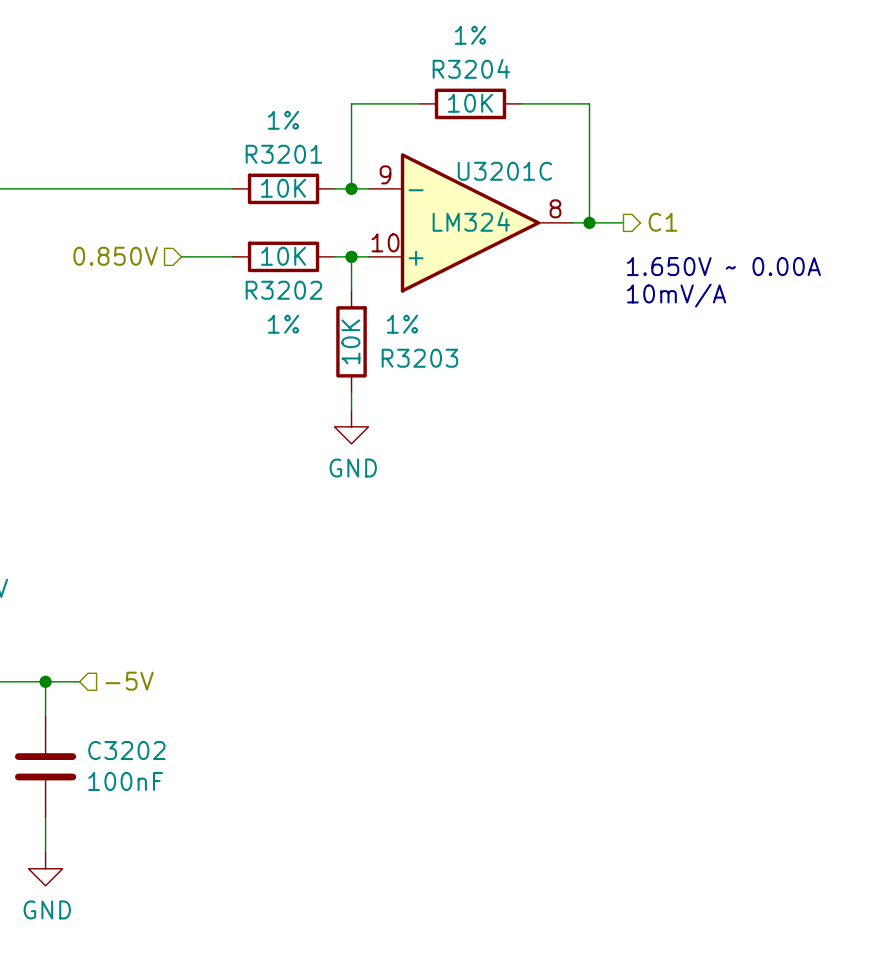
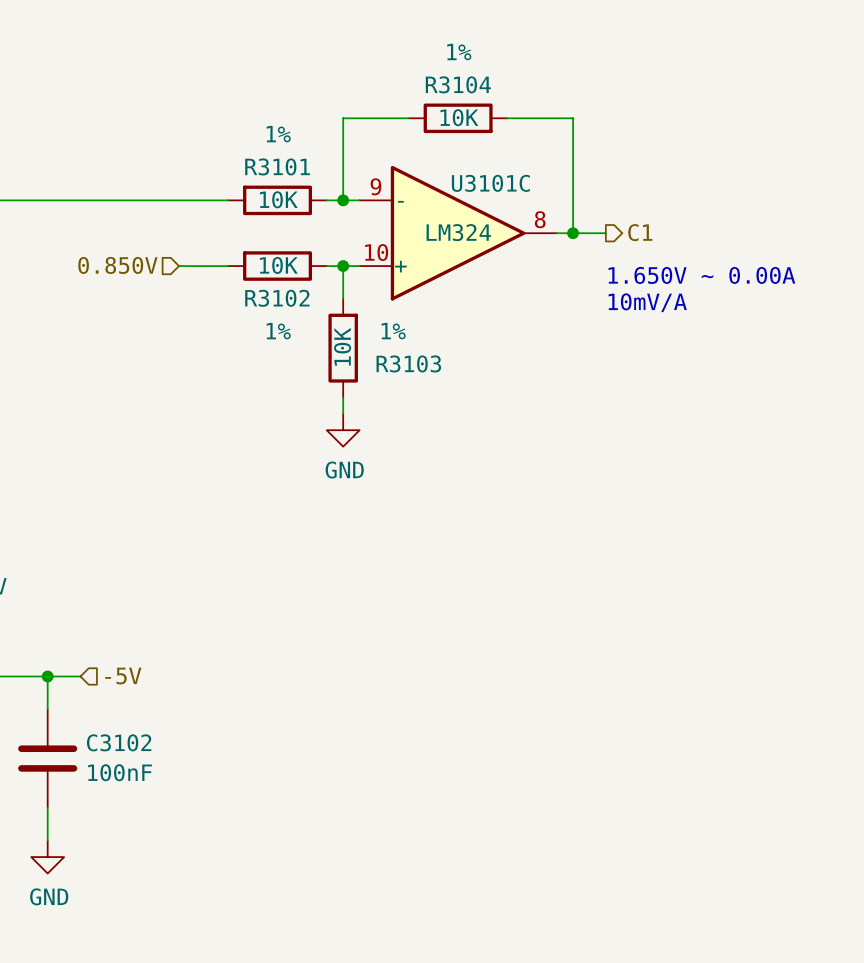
R3204 name: R3204 (471, 68) -> R3104 (458, 84)
R3201 name: R3201 (283, 154) -> R3101 (277, 166)
U3201C name: U3201C (504, 171) -> U3101C (490, 183)
R3202 name: R3202 (283, 290) -> R3102 (277, 298)
R3203 name: R3203 (419, 358) -> R3103 (408, 363)
C3202 name: C3202 (126, 750) -> C3102 (119, 742)

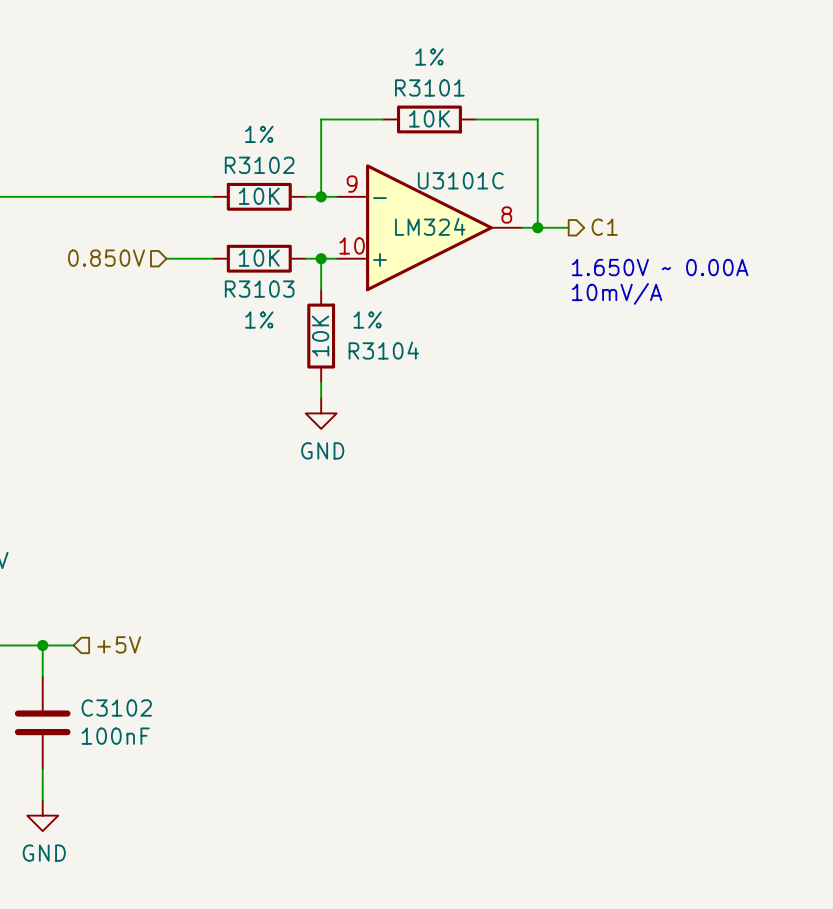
R3104 name: R3104 (458, 84) -> R3101 (429, 87)
R3101 name: R3101 (277, 166) -> R3102 (259, 165)
R3102 name: R3102 (277, 298) -> R3103 (259, 289)
R3103 name: R3103 (408, 363) -> R3104 (383, 350)
hierarchical label: -5V (123, 676) -> +5V (119, 644)

